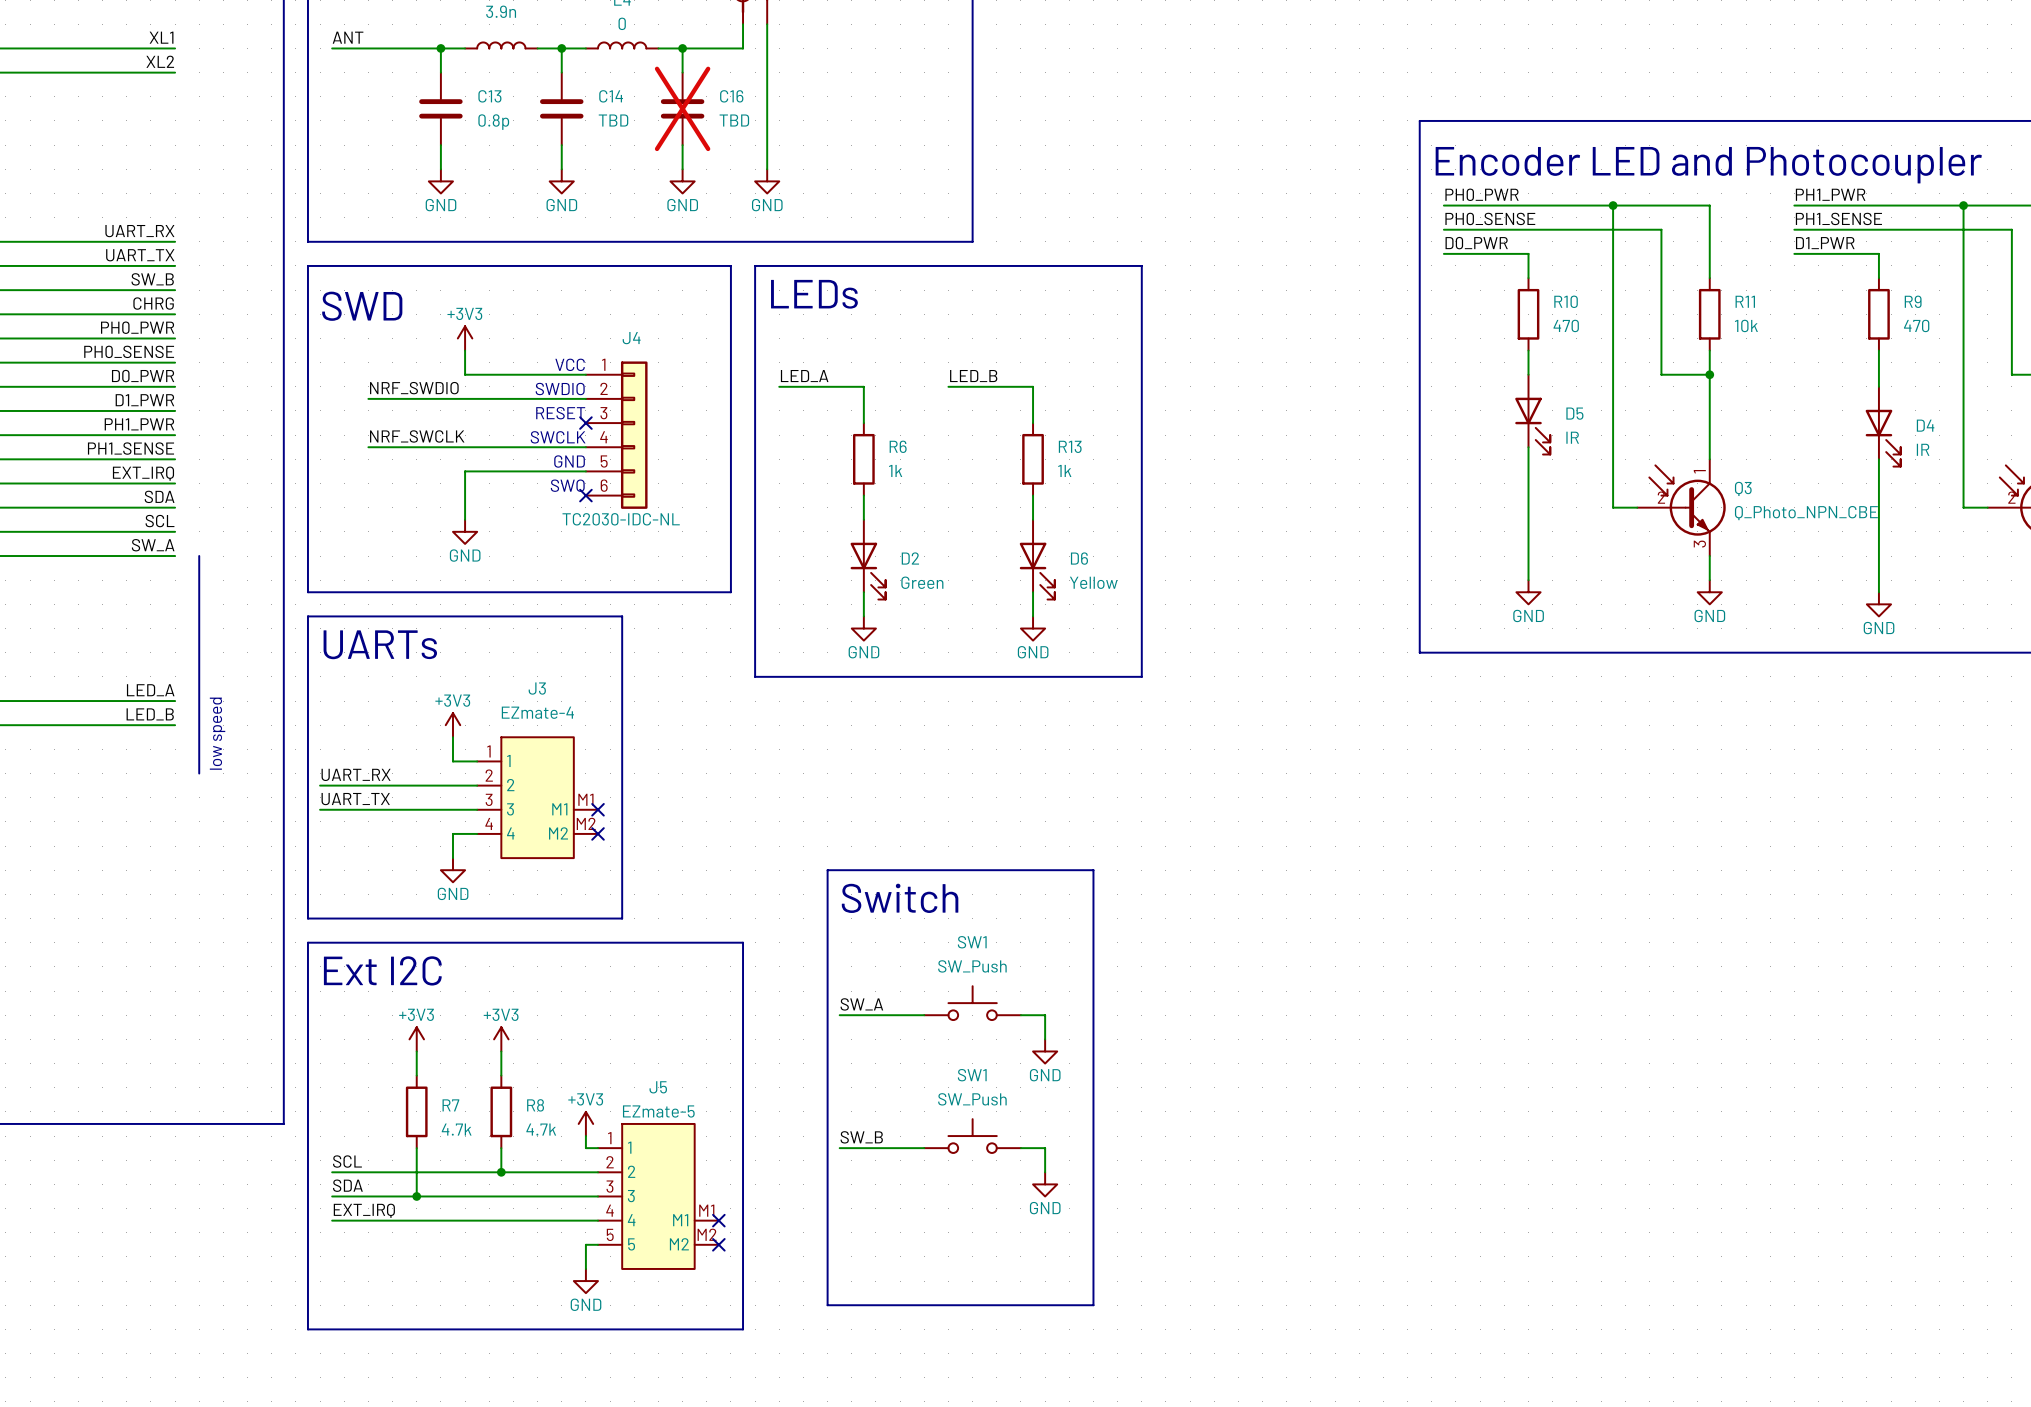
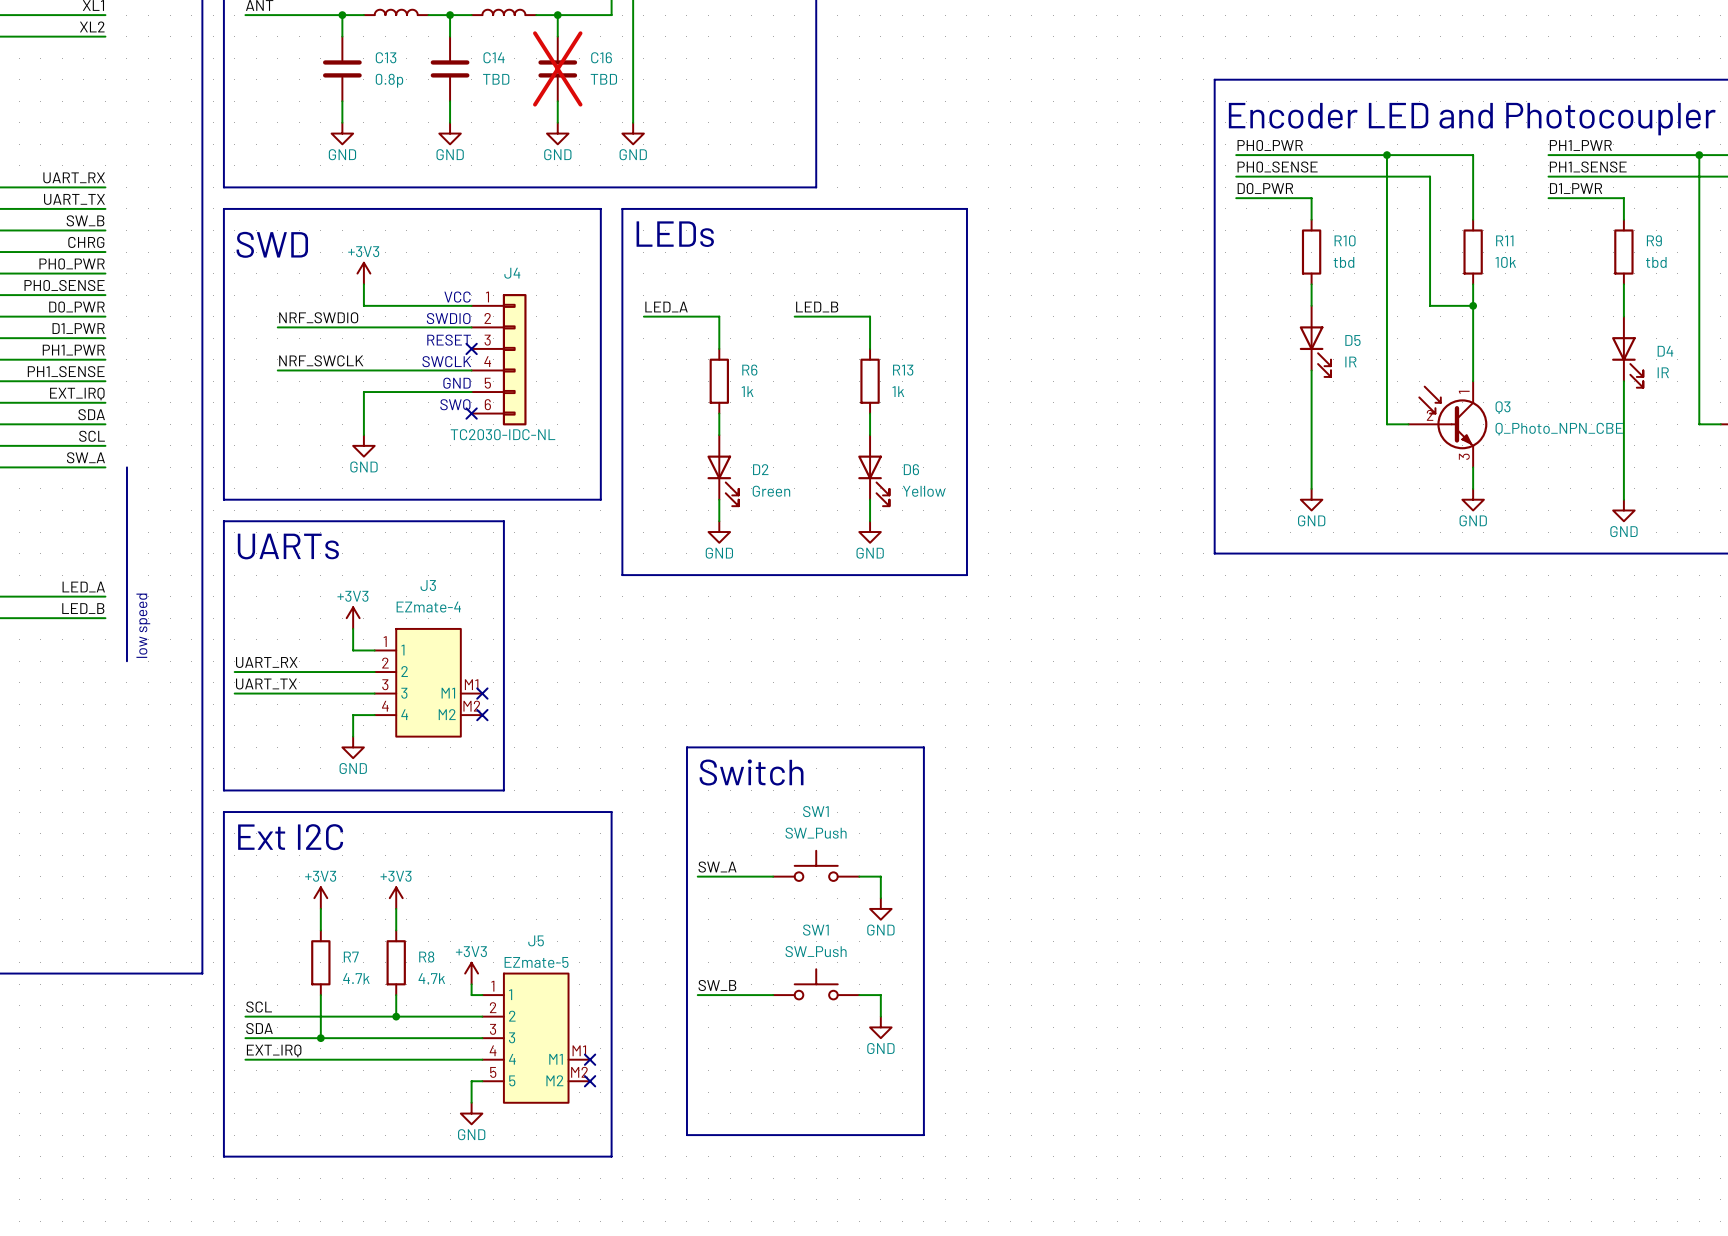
R10 value: 470 (1566, 325) -> tbd (1343, 262)
R9 value: 470 (1916, 325) -> tbd (1656, 262)

